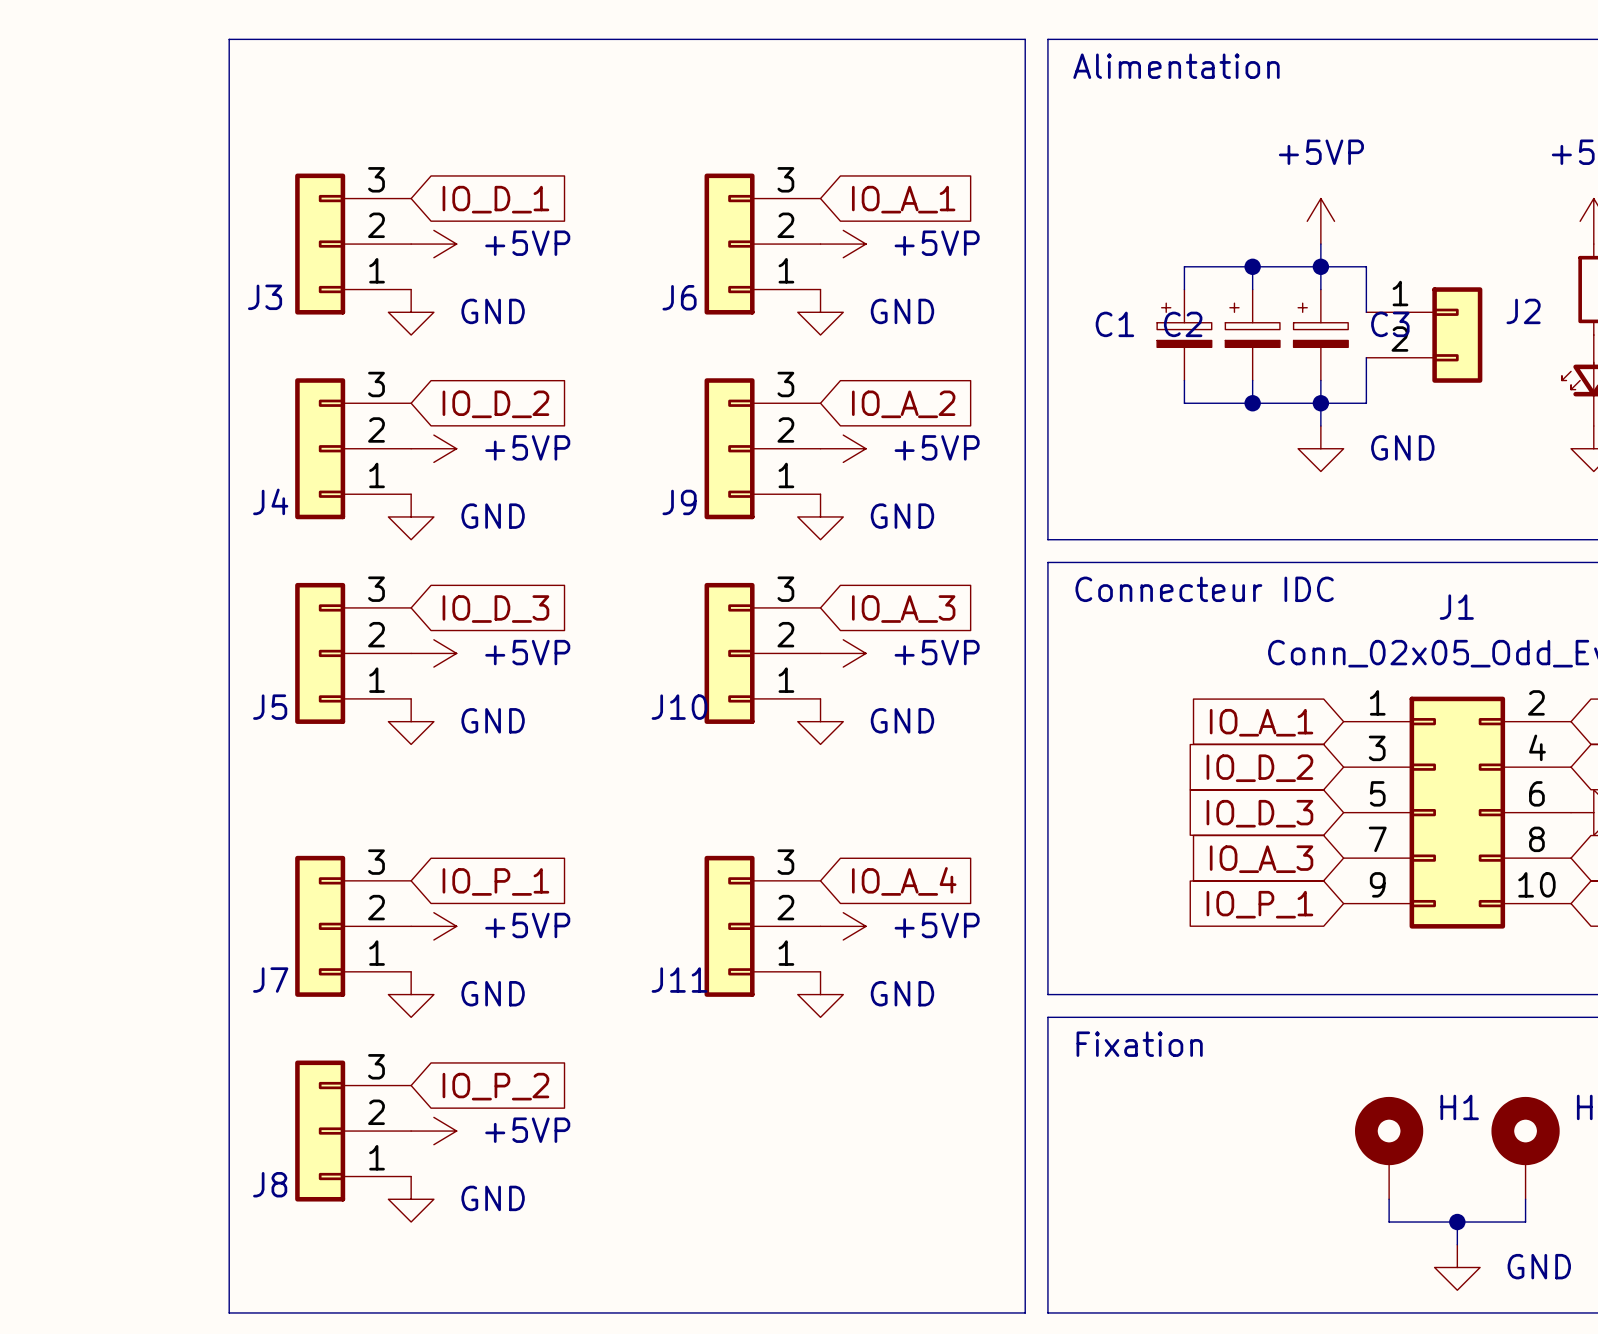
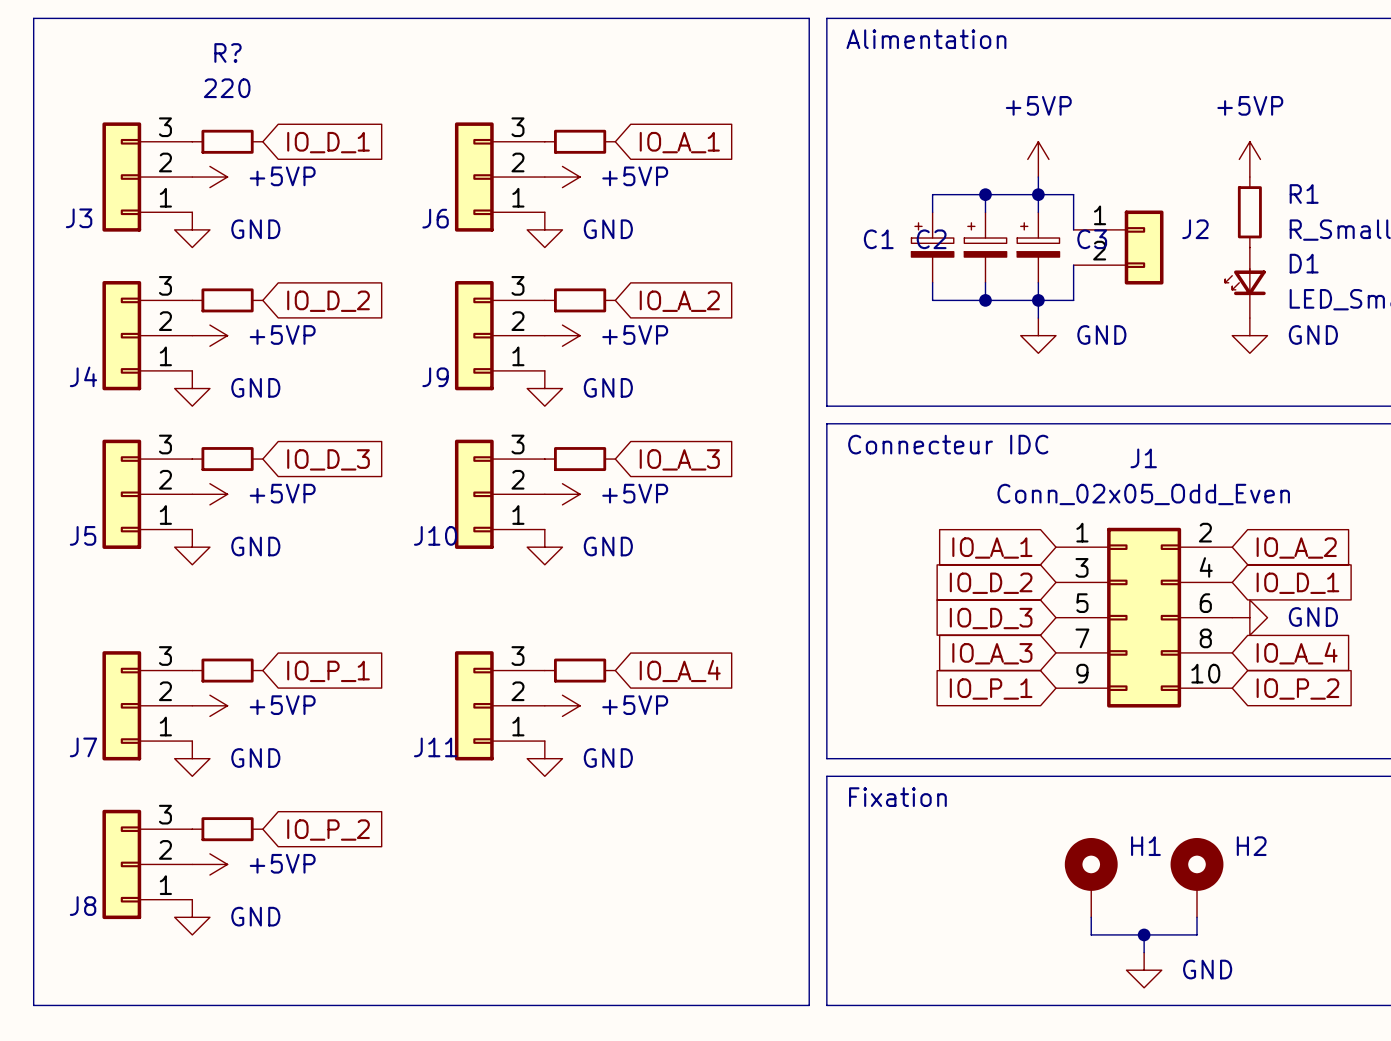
line: (229, 39) (229, 1312) -> (192, 18) (33, 18) (33, 1005) (192, 1005)
R?: none -> 220 (227, 141)
part: none -> (580, 141)
global label position: IO_D_1 (495, 199) -> IO_D_1 (328, 142)
global label position: IO_A_1 (903, 199) -> IO_A_1 (679, 142)
power symbol: none -> +5VP (209, 177)
J3 position: (353, 244) -> (147, 177)
power symbol: +5VP (433, 244) -> none
power symbol: none -> +5VP (562, 177)
J6 position: (762, 244) -> (499, 177)
power symbol: +5VP (843, 244) -> none
power symbol: none -> GND (192, 229)
power symbol: GND (411, 312) -> none
power symbol: none -> GND (544, 229)
power symbol: GND (820, 312) -> none
part: none -> (227, 300)
part: none -> (580, 300)
global label position: IO_D_2 (495, 404) -> IO_D_2 (328, 301)
global label position: IO_A_2 (903, 404) -> IO_A_2 (679, 301)
power symbol: none -> +5VP (209, 335)
J4 position: (353, 448) -> (147, 335)
power symbol: +5VP (433, 448) -> none
power symbol: none -> +5VP (562, 335)
J9 position: (762, 448) -> (499, 335)
power symbol: +5VP (843, 448) -> none
power symbol: none -> GND (192, 388)
power symbol: GND (411, 516) -> none
power symbol: none -> GND (544, 388)
power symbol: GND (820, 516) -> none
part: none -> (227, 459)
part: none -> (580, 459)
global label position: IO_D_3 (495, 609) -> IO_D_3 (328, 459)
global label position: IO_A_3 (903, 609) -> IO_A_3 (679, 459)
power symbol: none -> +5VP (209, 494)
J5 position: (353, 653) -> (147, 494)
power symbol: +5VP (433, 653) -> none
power symbol: none -> +5VP (562, 494)
J10 position: (762, 653) -> (499, 494)
power symbol: +5VP (843, 653) -> none
power symbol: none -> GND (192, 547)
power symbol: GND (411, 721) -> none
power symbol: none -> GND (544, 547)
power symbol: GND (820, 721) -> none
part: none -> (227, 670)
part: none -> (580, 670)
global label position: IO_P_1 (495, 881) -> IO_P_1 (328, 671)
global label position: IO_A_4 (904, 881) -> IO_A_4 (680, 670)
power symbol: none -> +5VP (209, 705)
J7 position: (353, 926) -> (147, 705)
power symbol: +5VP (433, 926) -> none
power symbol: none -> +5VP (562, 705)
J11 position: (762, 926) -> (499, 705)
power symbol: +5VP (843, 926) -> none
power symbol: none -> GND (192, 758)
power symbol: GND (411, 994) -> none
power symbol: none -> GND (544, 758)
power symbol: GND (820, 994) -> none
part: none -> (227, 829)
global label position: IO_P_2 (495, 1086) -> IO_P_2 (328, 830)
power symbol: none -> +5VP (209, 864)
J8 position: (353, 1131) -> (147, 864)
power symbol: +5VP (433, 1131) -> none
power symbol: none -> GND (192, 917)
power symbol: GND (411, 1199) -> none

